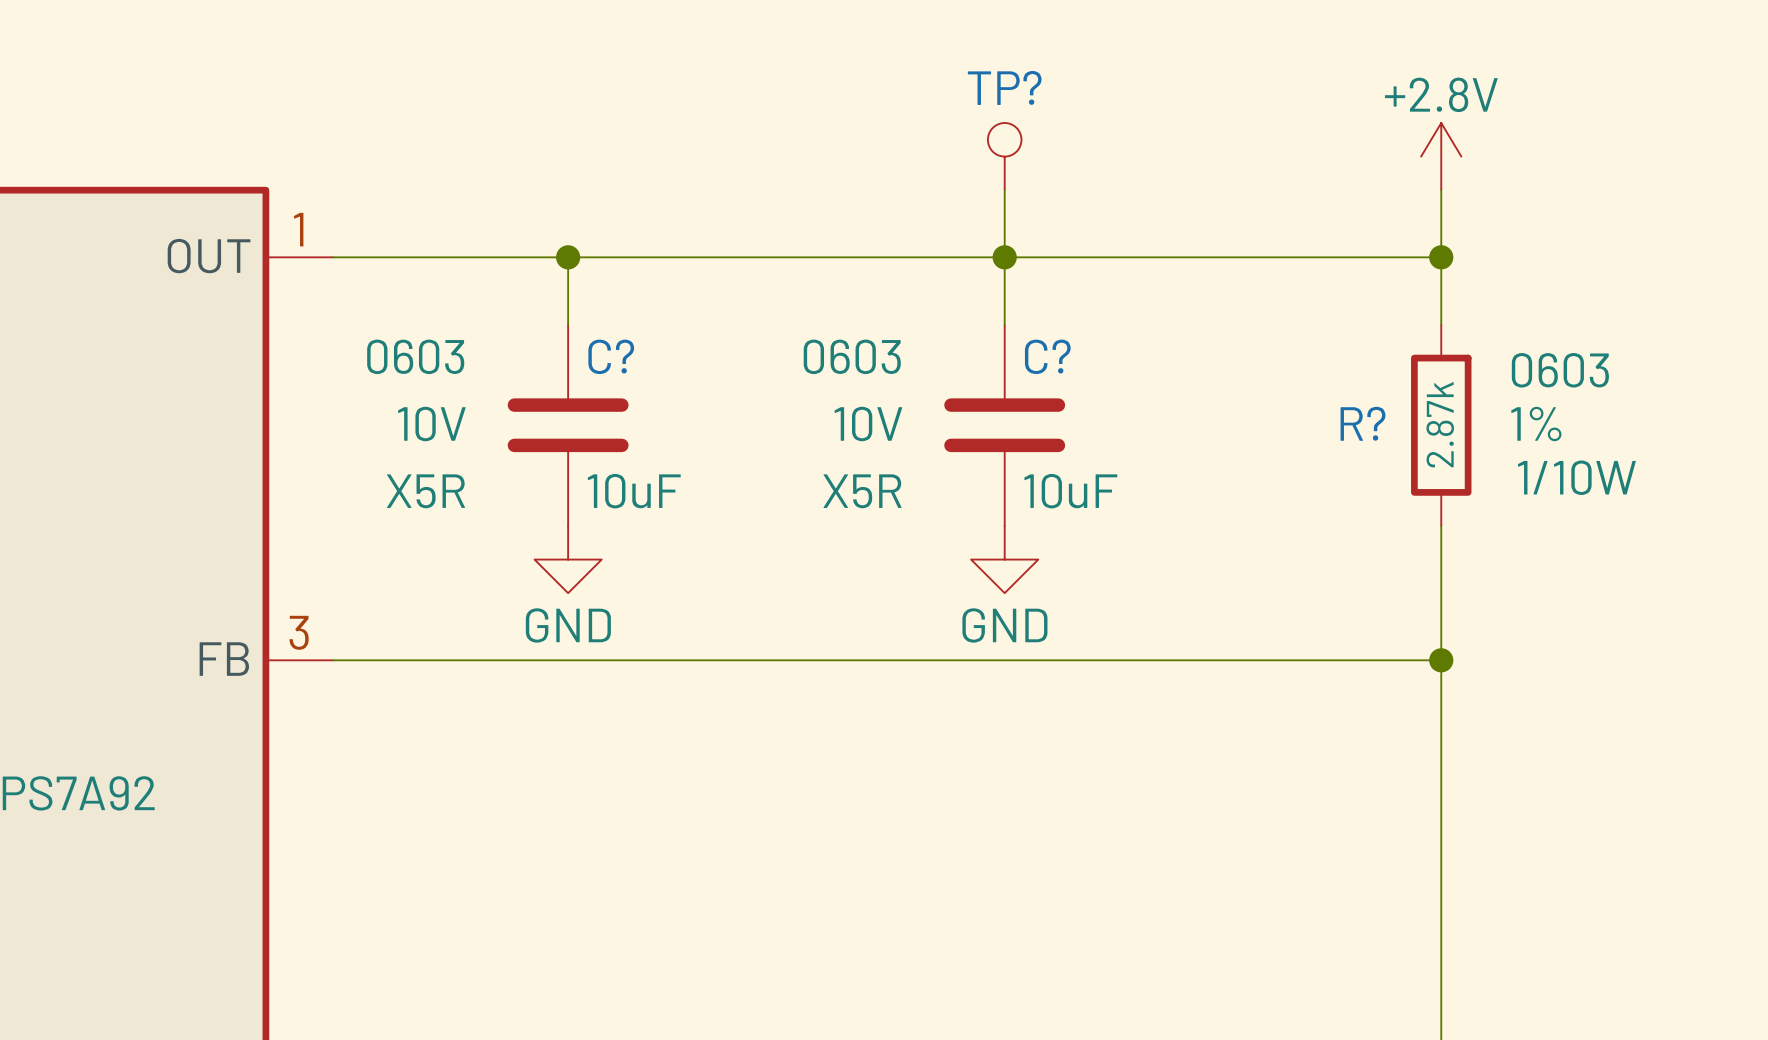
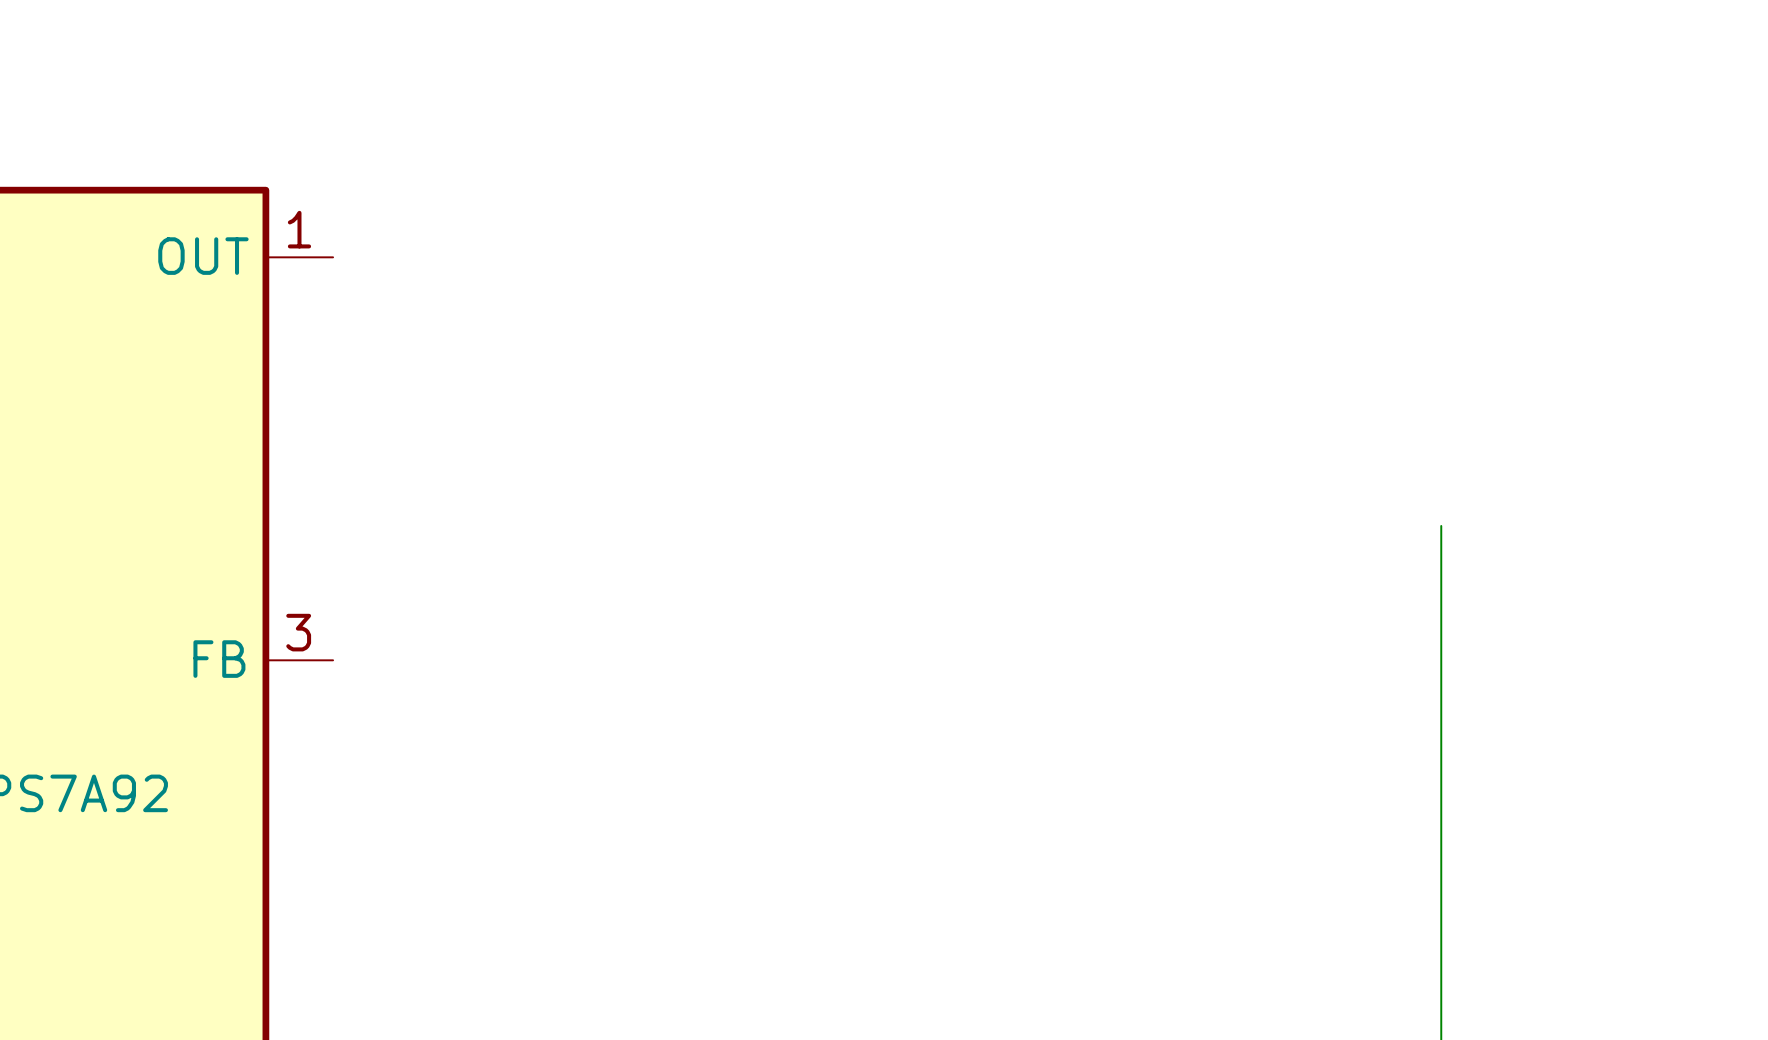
TP?: (1004, 156) -> none
power symbol: +2.8V (1441, 156) -> none
wire: (1004, 190) (1004, 324) -> none
wire: (1441, 190) (1441, 324) -> none
wire: (333, 257) (1441, 257) -> none
wire: (568, 257) (568, 324) -> none
junction: (568, 257) -> none
junction: (1004, 257) -> none
junction: (1441, 257) -> none
C?: 10uF (568, 425) -> none
C?: 10uF (1004, 425) -> none
R?: 2.87k (1441, 425) -> none
power symbol: GND (568, 559) -> none
power symbol: GND (1004, 559) -> none
wire: (333, 660) (1441, 660) -> none
junction: (1441, 660) -> none

